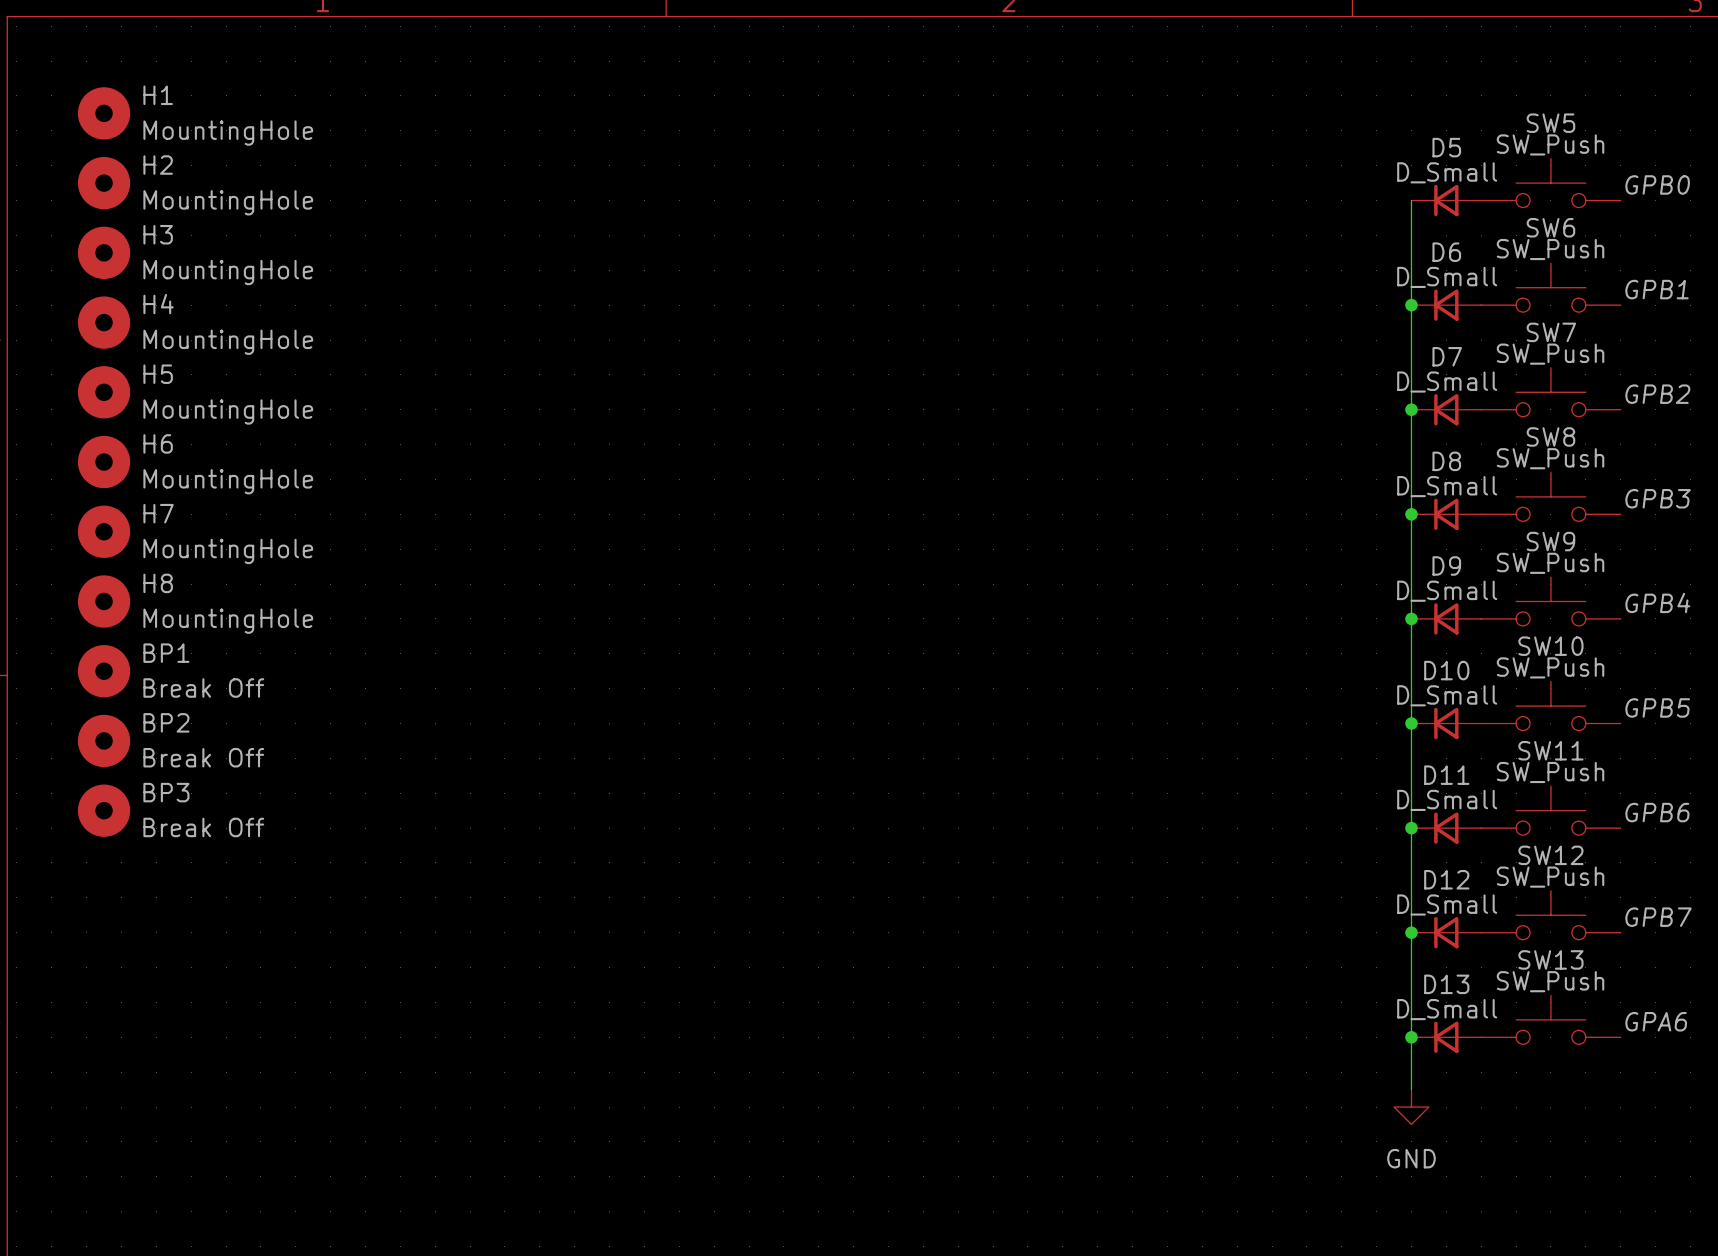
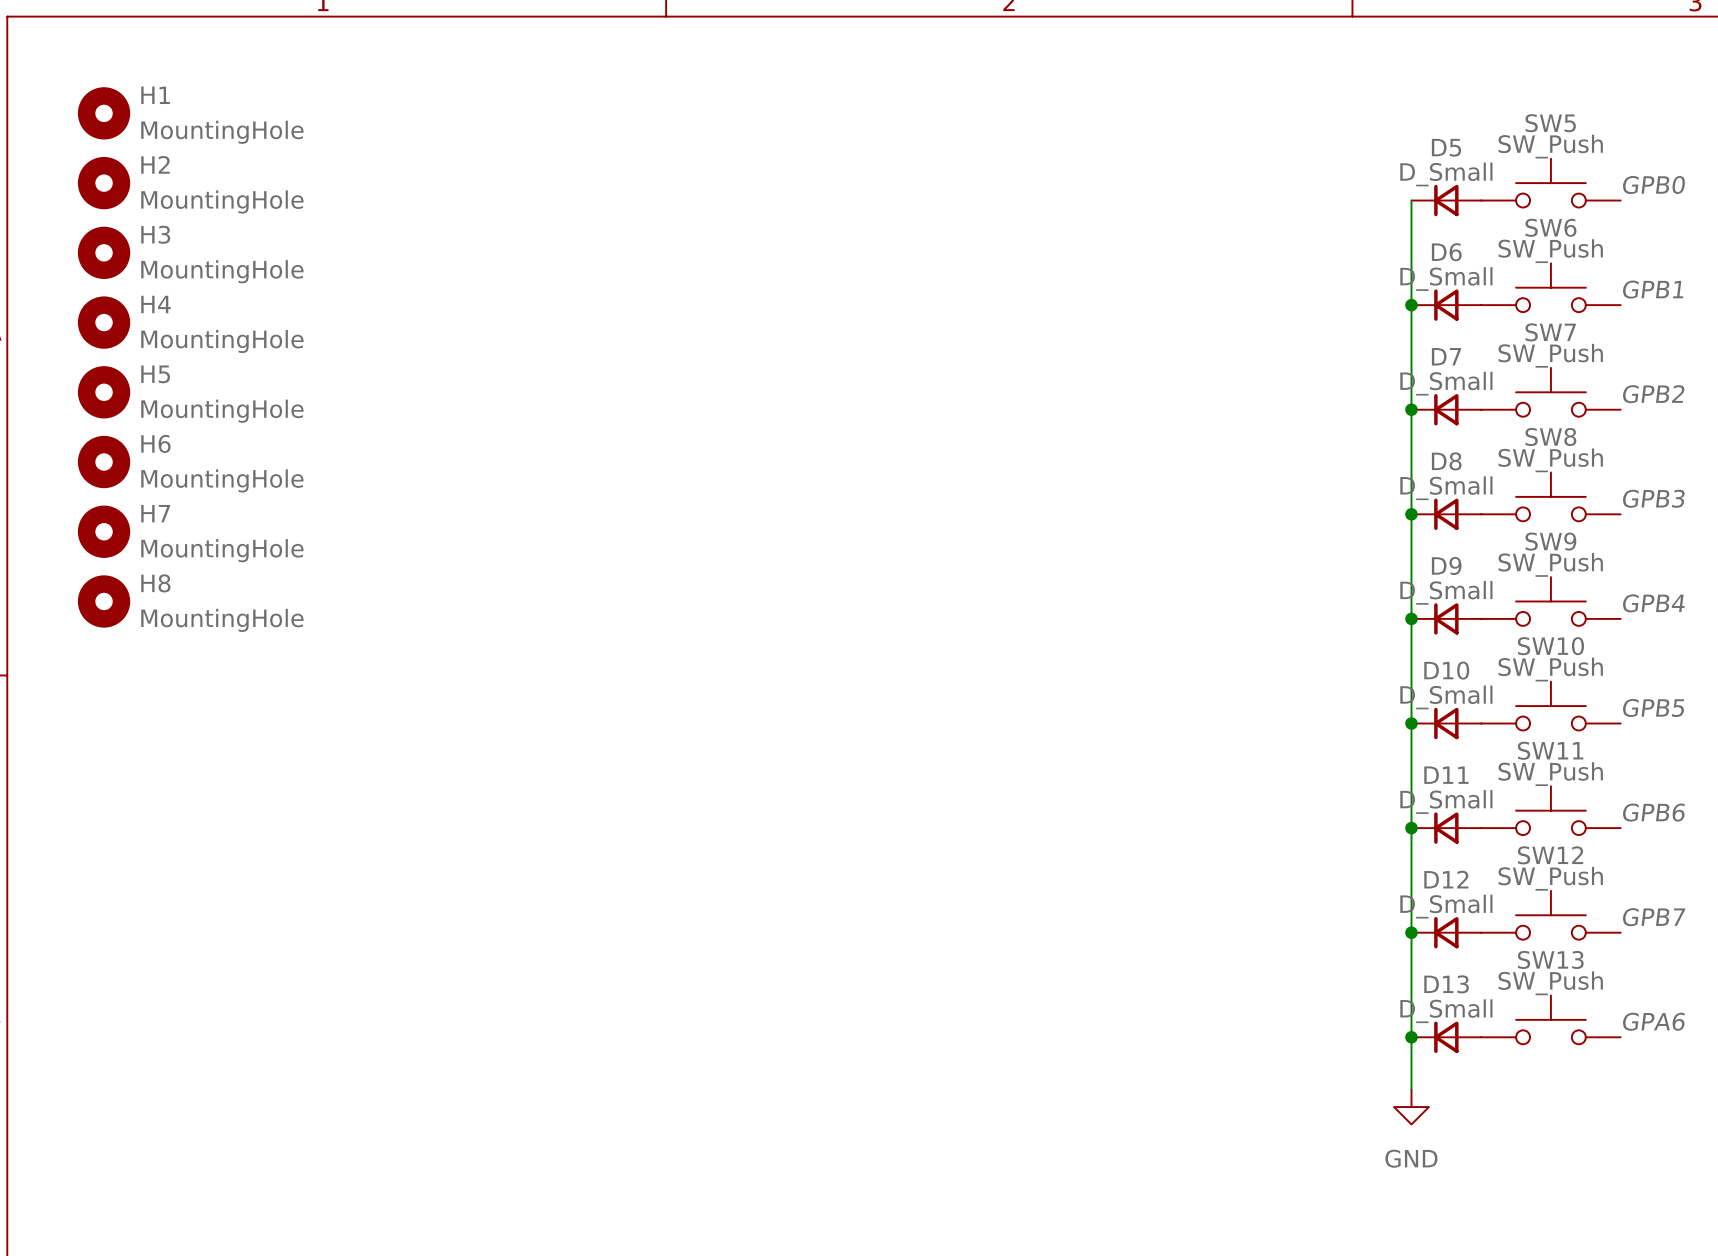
BP1: Break Off (104, 671) -> none
BP2: Break Off (104, 740) -> none
BP3: Break Off (104, 810) -> none

